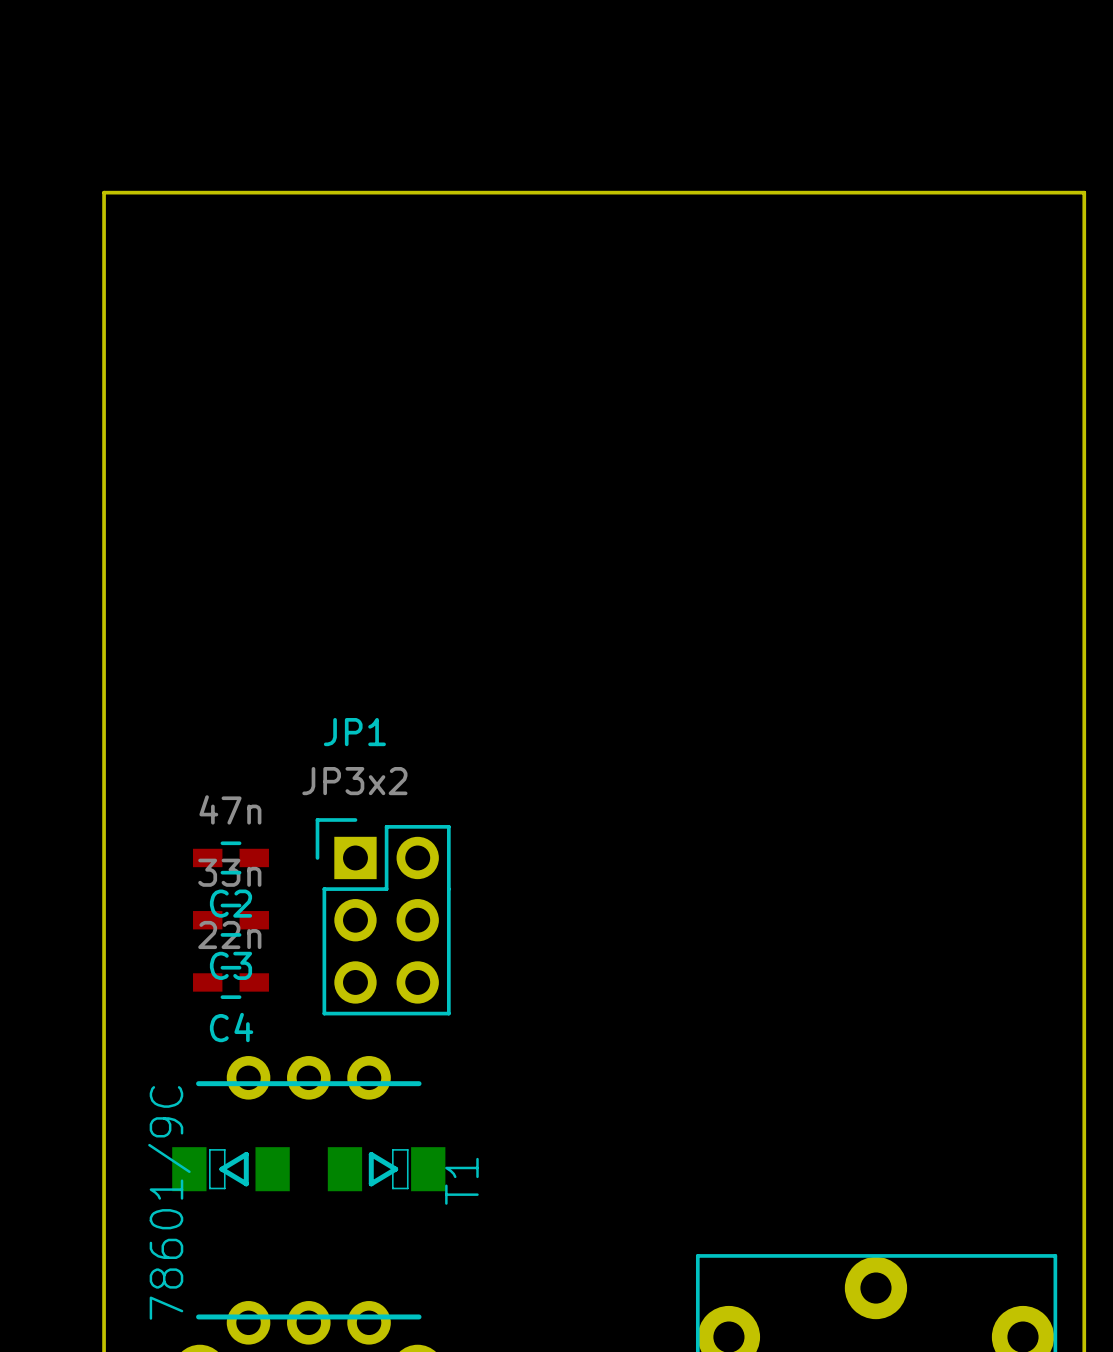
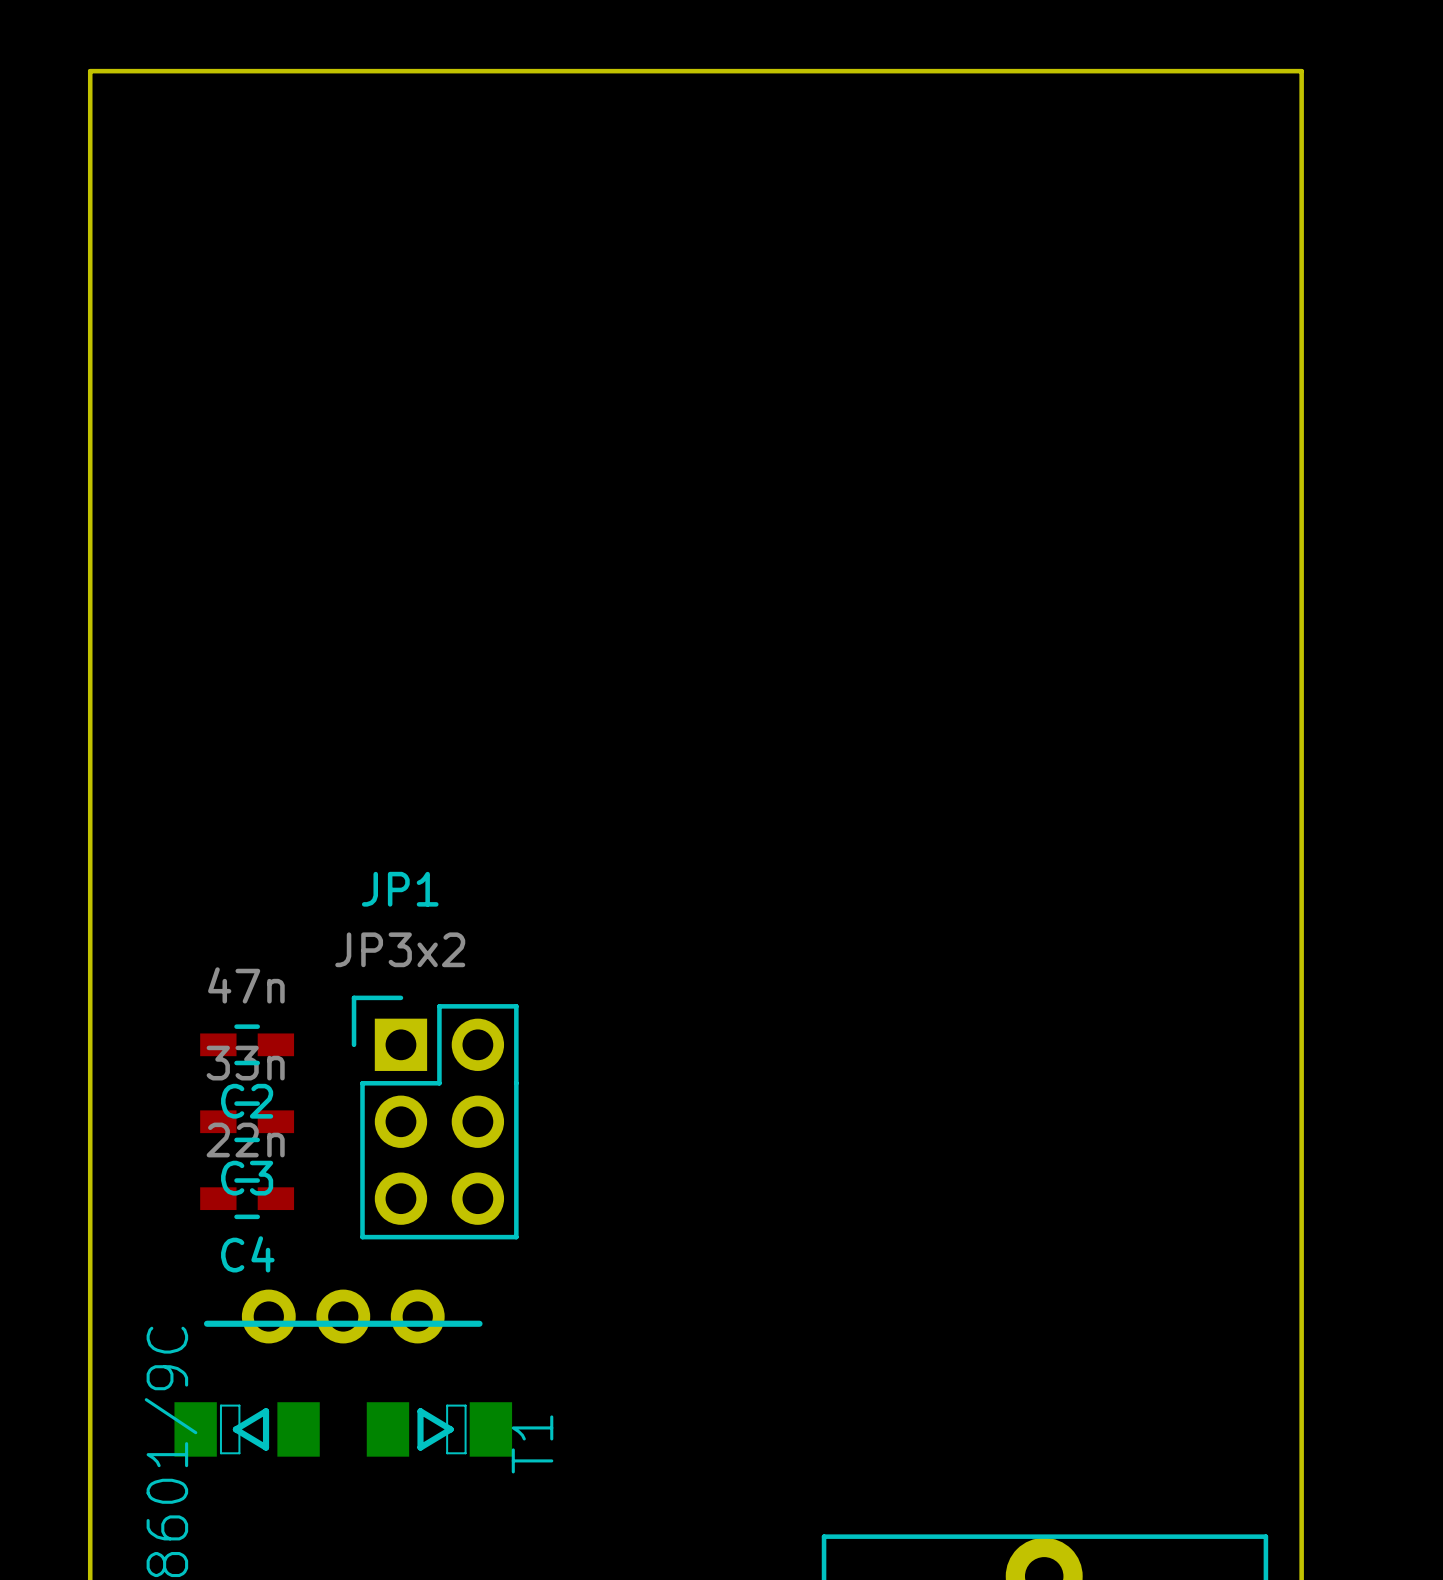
board edge: (104, 192) (1084, 192) -> (90, 222) (90, 71) (1301, 71) (1301, 222)

